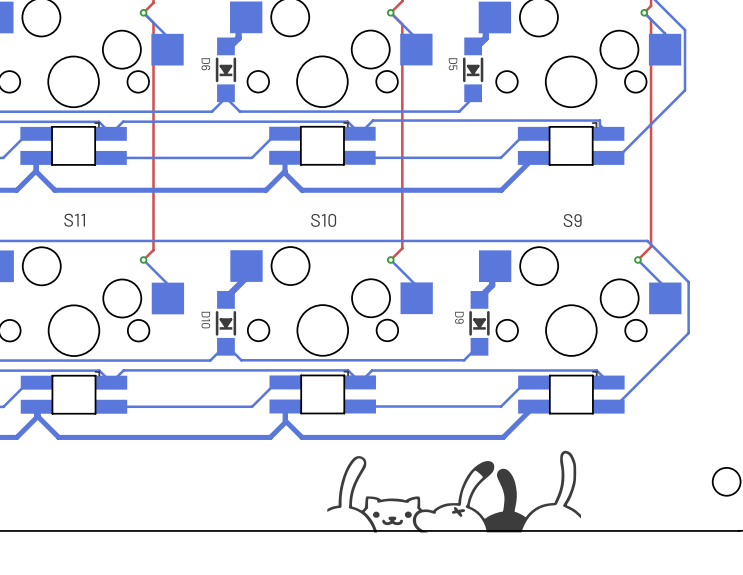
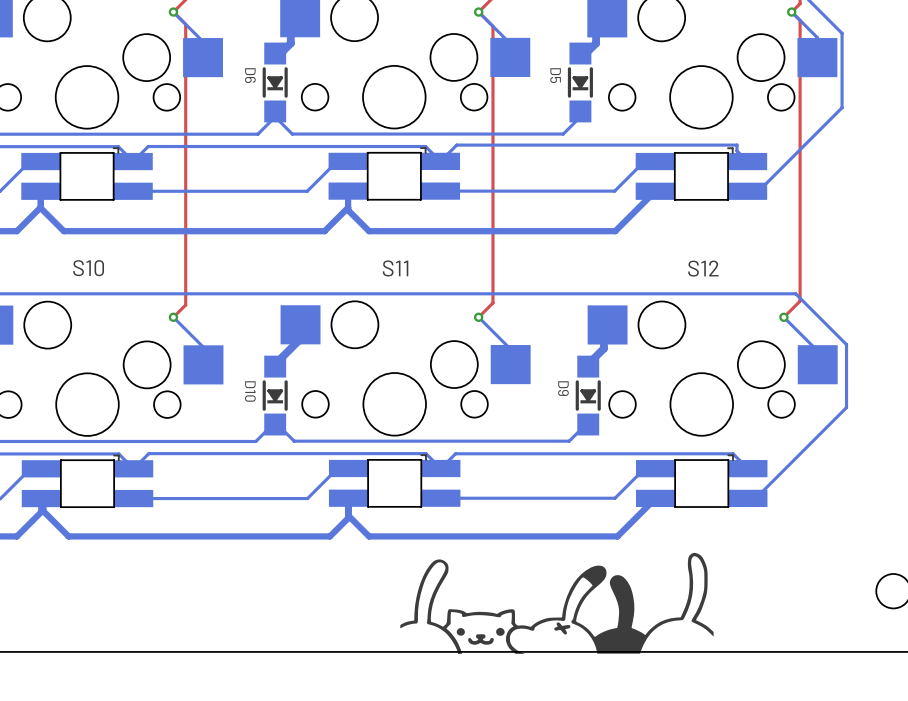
S11 name: S11 (74, 220) -> S10 (88, 268)
S10 name: S10 (323, 220) -> S11 (395, 268)
S9 name: S9 (572, 220) -> S12 (703, 268)

